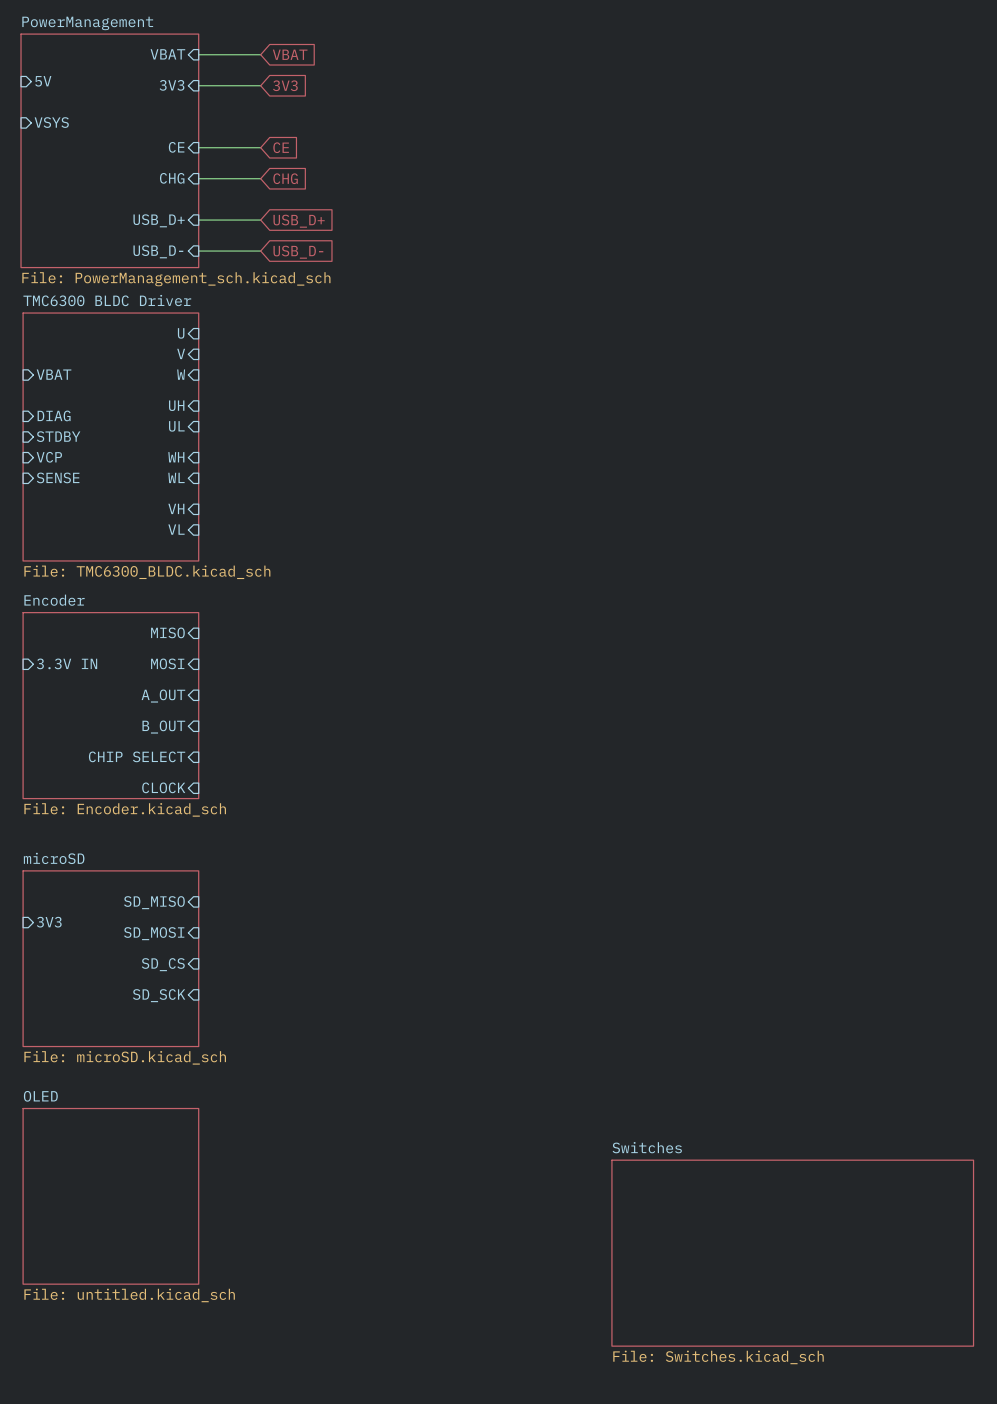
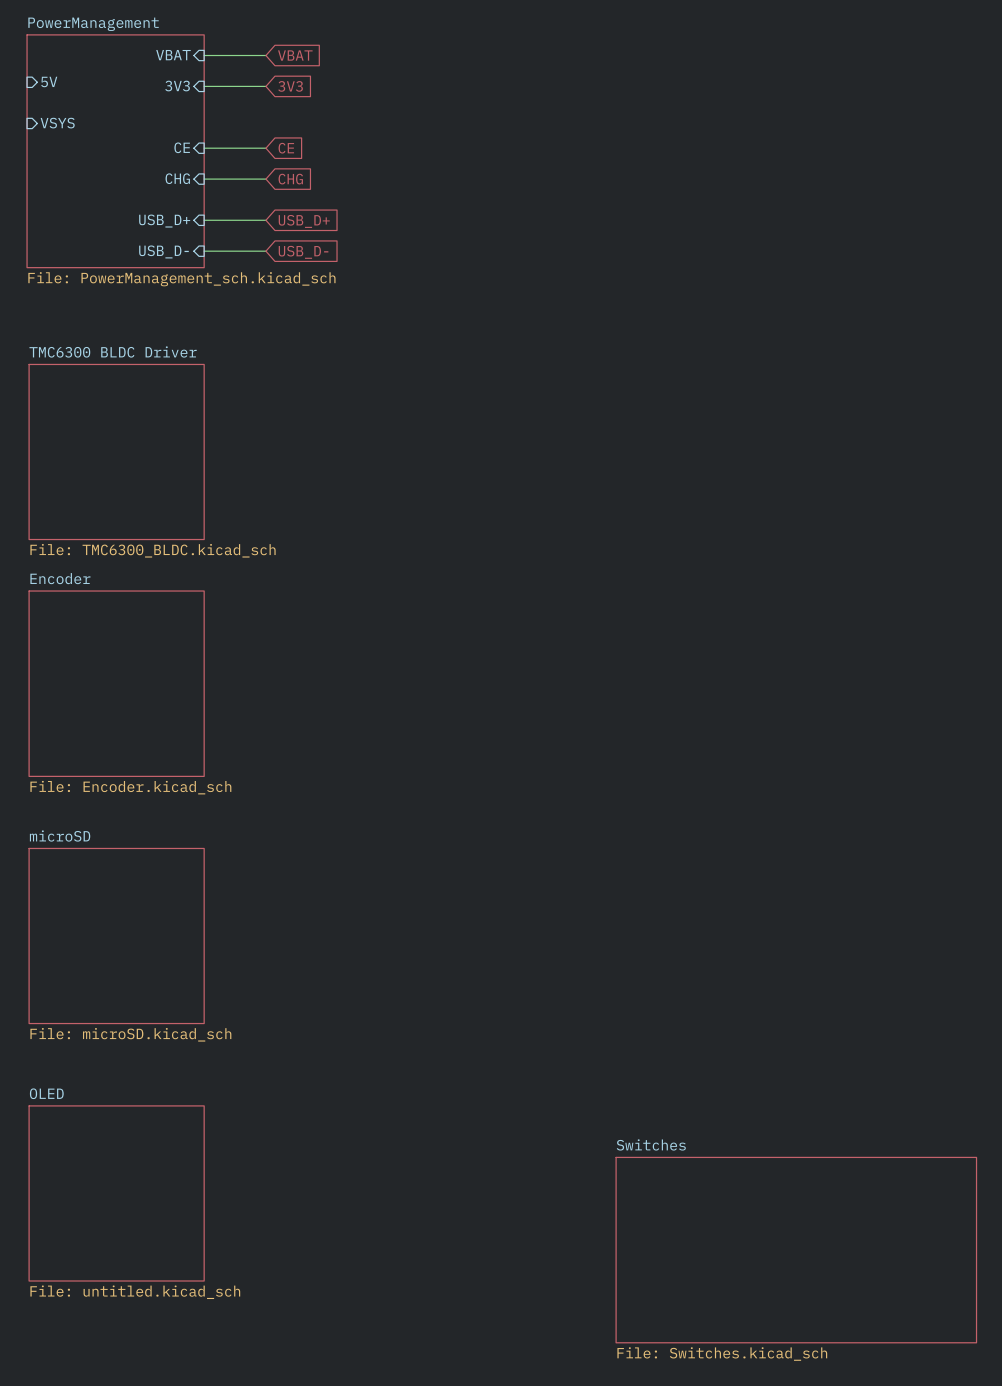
sheet TMC6300 BLDC Driver name position: TMC6300 BLDC Driver (107, 300) -> TMC6300 BLDC Driver (113, 351)
sheet TMC6300 BLDC Driver shape: [22, 312, 200, 562] -> [28, 363, 205, 541]
sheet pin: U (181, 333) -> none
sheet pin: V (181, 353) -> none
sheet pin: VBAT (54, 374) -> none
sheet pin: W (181, 374) -> none
sheet pin: UH (176, 405) -> none
sheet pin: DIAG (54, 415) -> none
sheet pin: UL (176, 426) -> none
sheet pin: STDBY (58, 436) -> none
sheet pin: VCP (49, 457) -> none
sheet pin: WH (176, 457) -> none
sheet pin: SENSE (58, 477) -> none
sheet pin: WL (176, 477) -> none
sheet pin: VH (176, 508) -> none
sheet pin: VL (176, 529) -> none
sheet TMC6300 BLDC Driver value position: File: TMC6300_BLDC.kicad_sch (147, 572) -> File: TMC6300_BLDC.kicad_sch (153, 550)
sheet pin: MISO (167, 632) -> none
sheet pin: 3.3V IN (67, 663) -> none
sheet pin: MOSI (167, 663) -> none
sheet pin: A_OUT (163, 696) -> none
sheet Encoder position: (110, 705) -> (116, 683)
sheet pin: B_OUT (163, 727) -> none
sheet pin: CHIP SELECT (137, 756) -> none
sheet pin: CLOCK (163, 787) -> none
sheet pin: SD_MISO (154, 902) -> none
sheet pin: 3V3 (49, 922) -> none
sheet pin: SD_MOSI (154, 933) -> none
sheet microSD position: (110, 958) -> (116, 936)
sheet pin: SD_CS (163, 964) -> none
sheet pin: SD_SCK (159, 995) -> none

